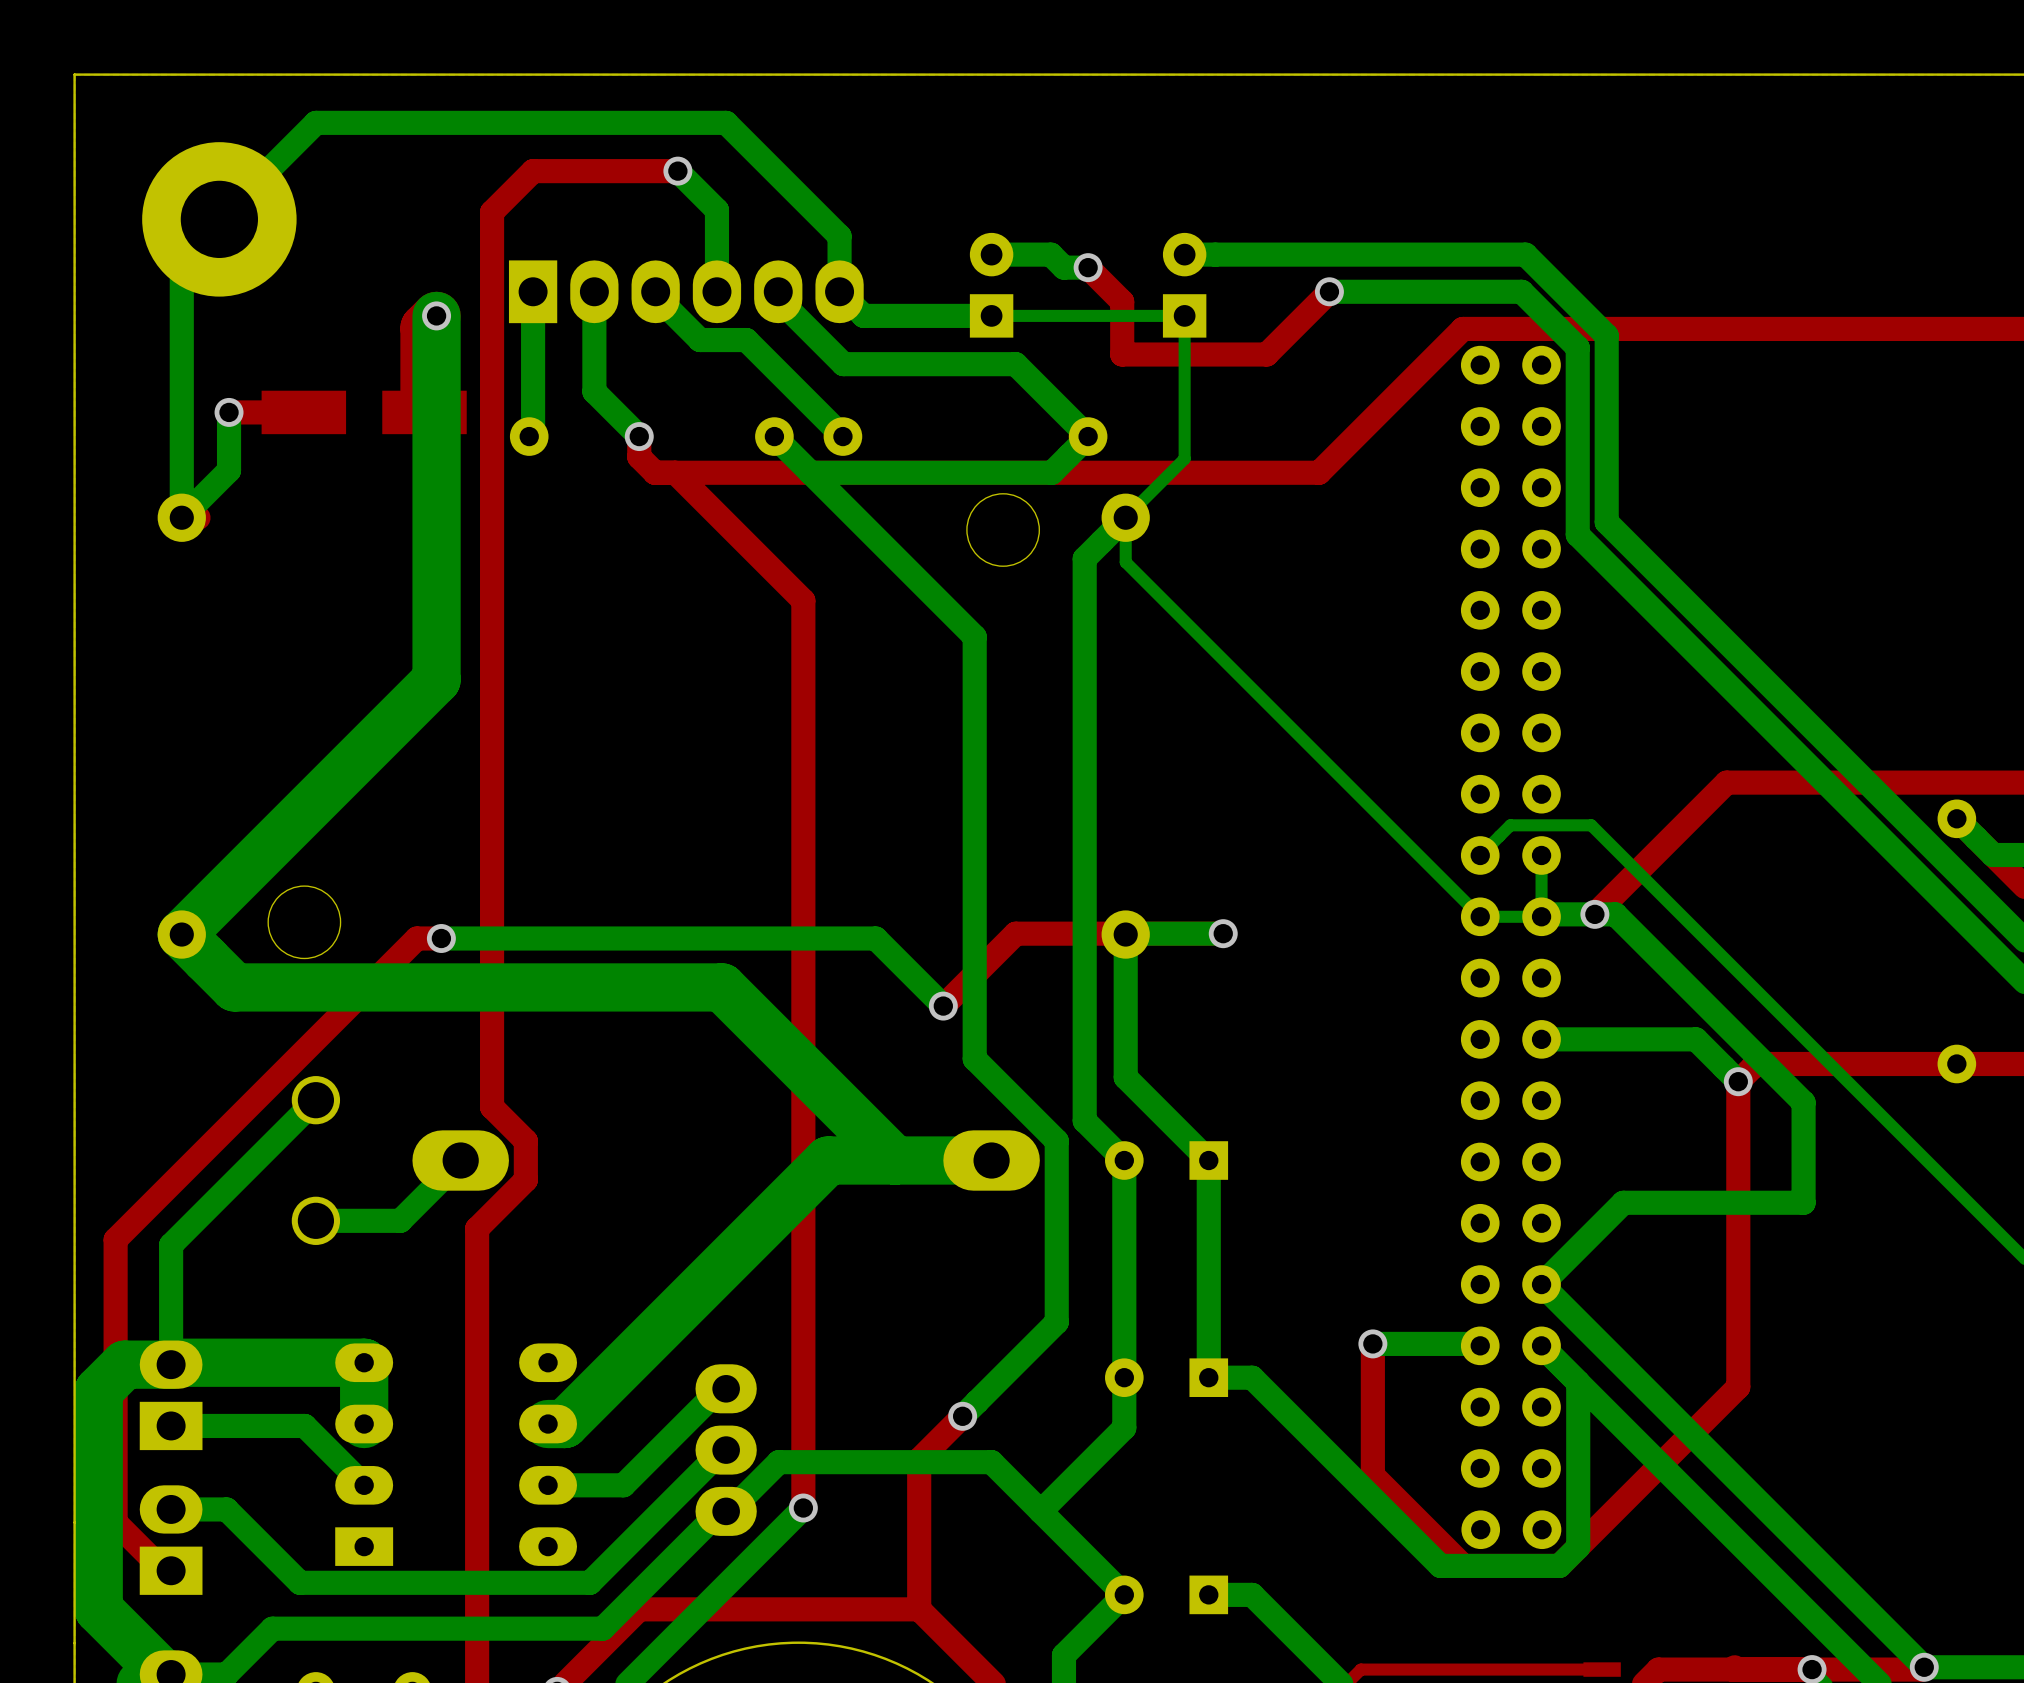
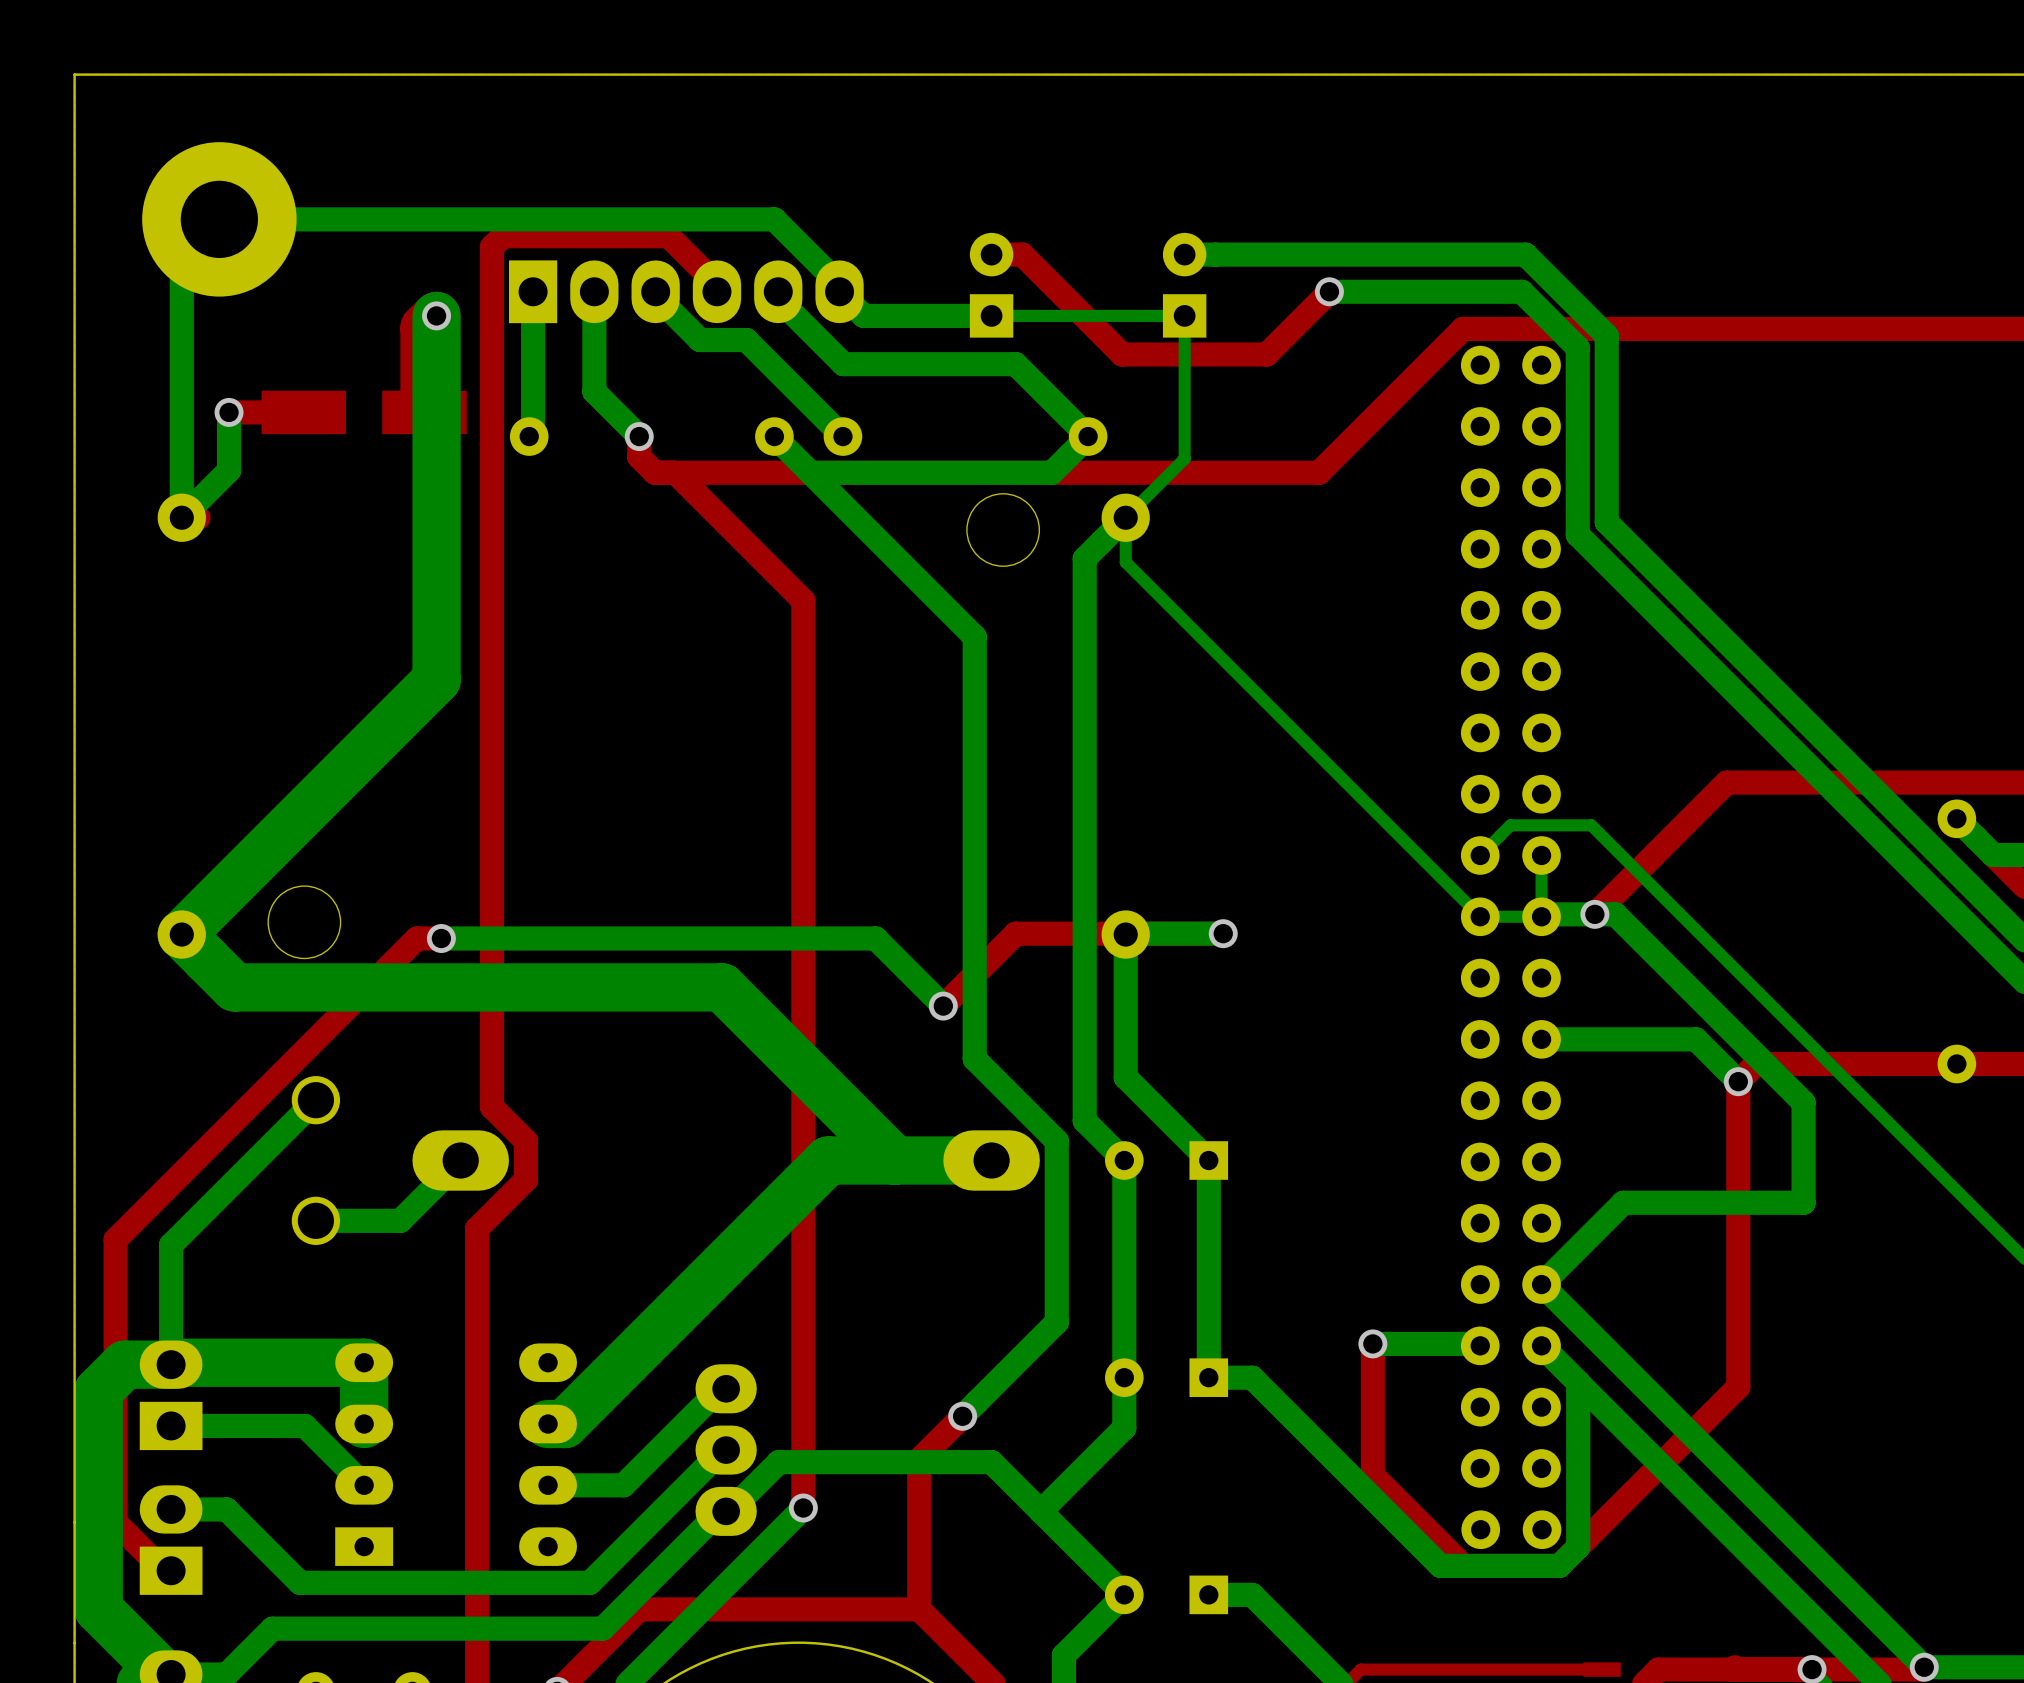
bottom track: (677, 171) (716, 210) (716, 291) -> none
top track: (677, 171) (533, 171) (492, 212) (492, 246) -> (716, 284) (668, 236) (502, 236) (492, 246)
via: (677, 171) -> none
bottom track: (219, 219) (315, 122) (726, 122) (839, 236) (839, 284) -> (219, 219) (774, 219) (839, 284)
bottom track: (991, 254) (1050, 254) (1063, 267) (1088, 267) -> none
top track: (1088, 267) (1122, 301) (1122, 354) -> (991, 254) (1022, 254) (1122, 354)
via: (1088, 267) -> none

